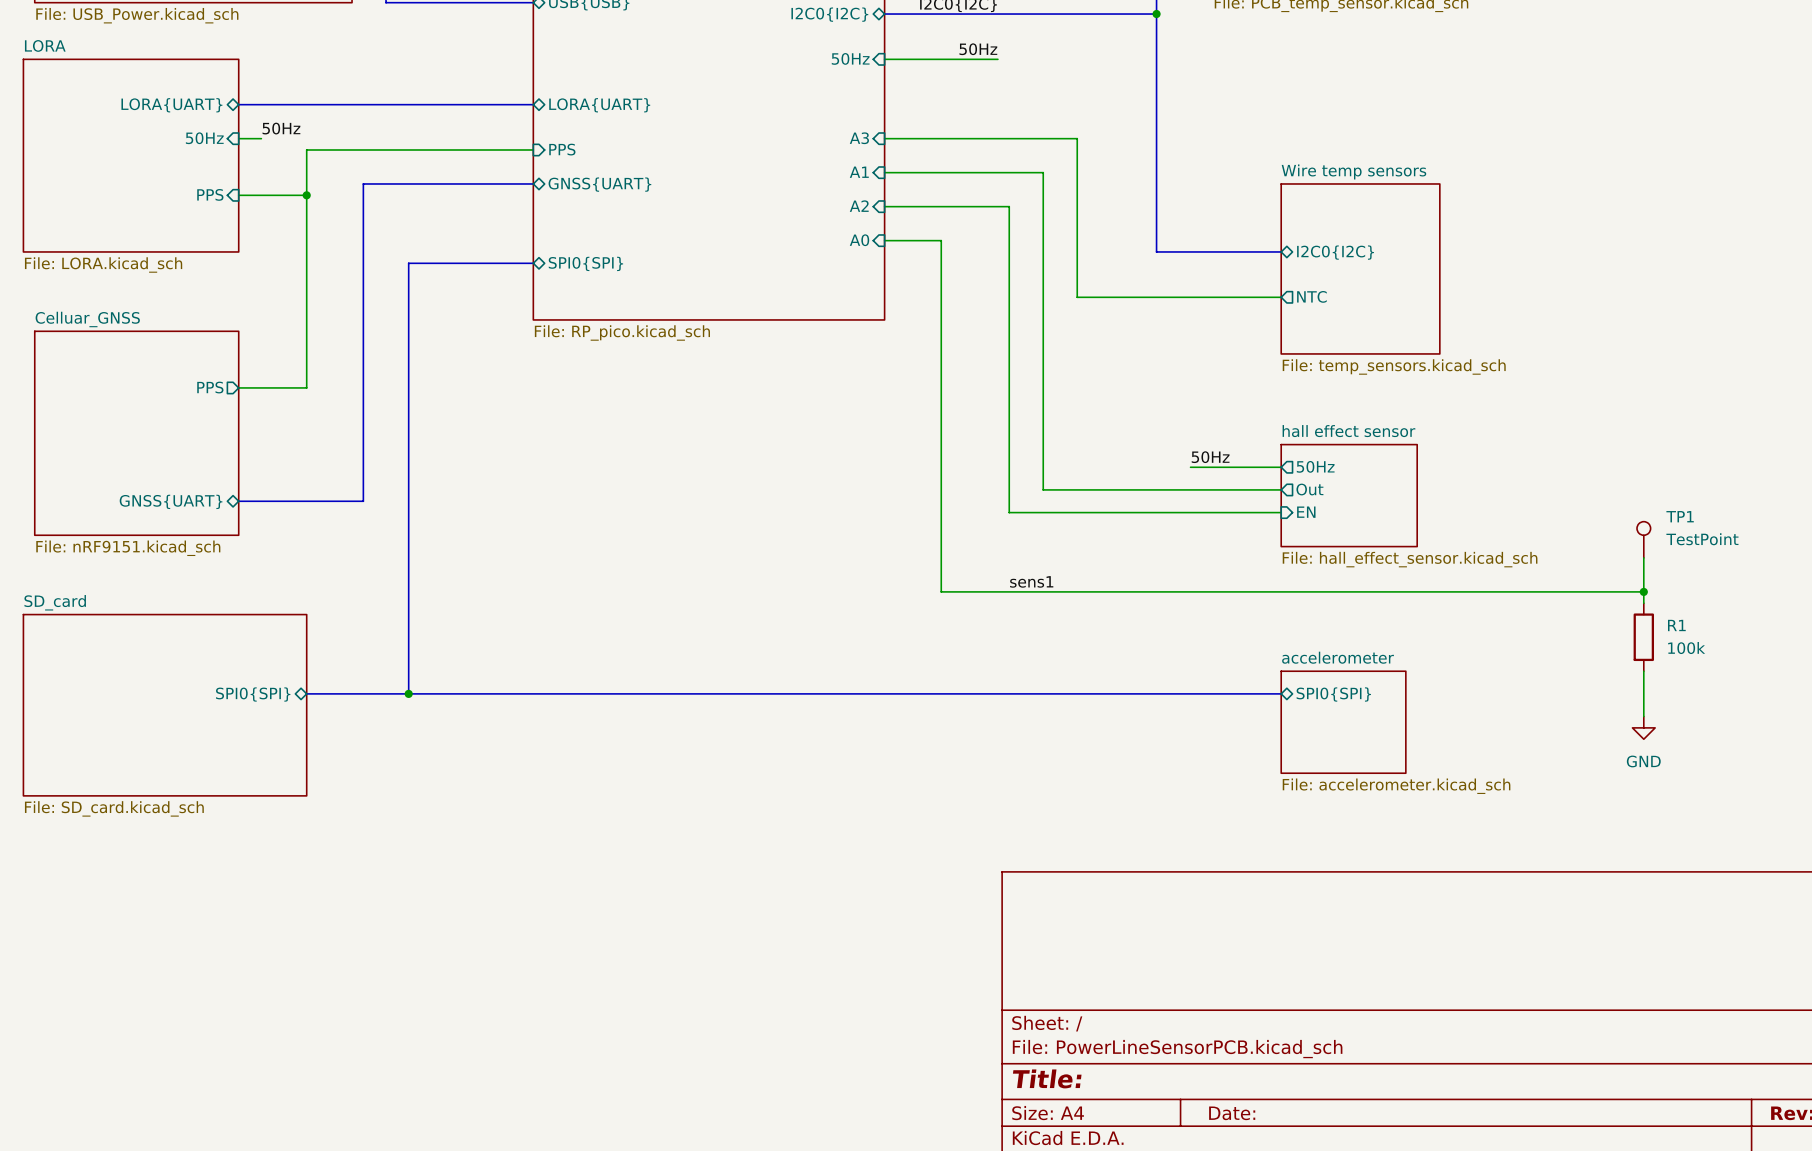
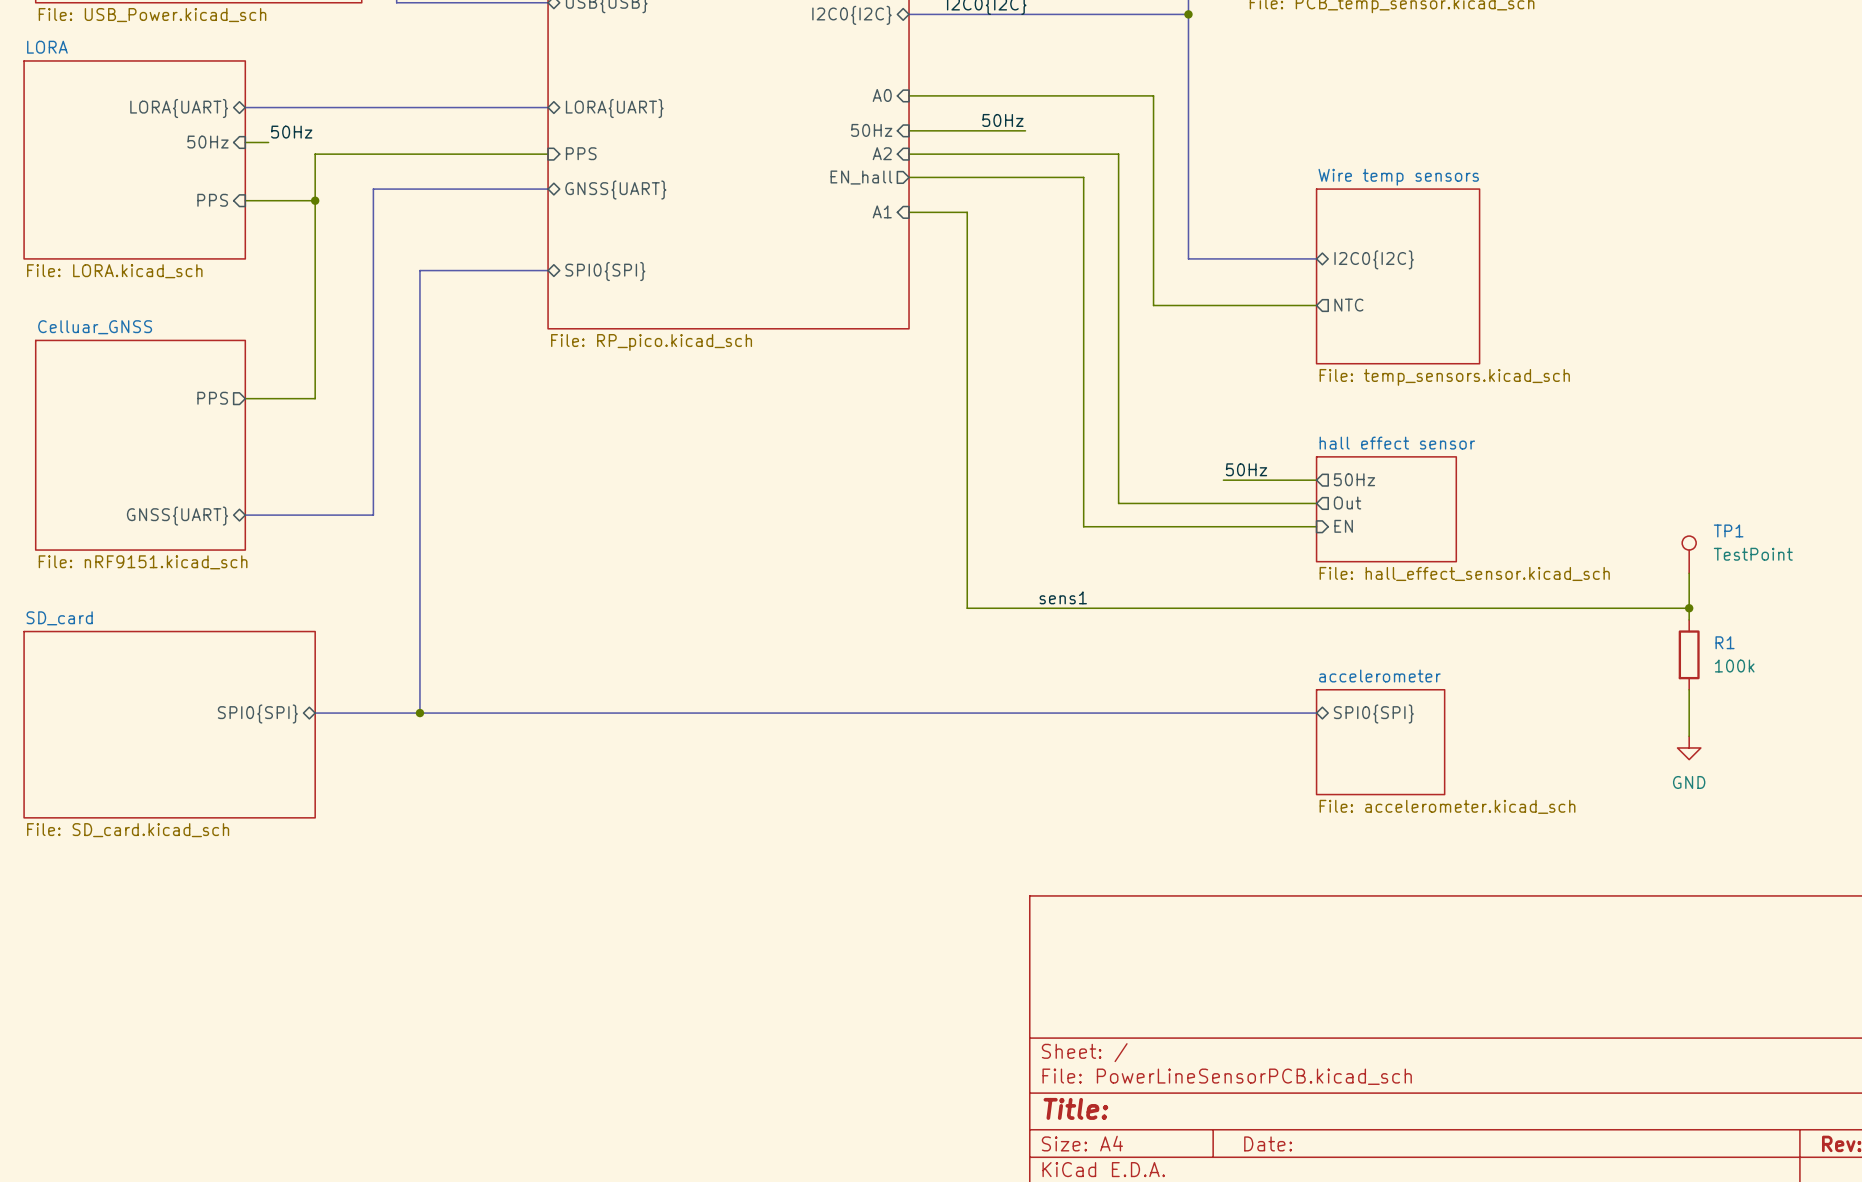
label position: 50Hz (978, 49) -> 50Hz (1002, 120)
sheet pin position: 50Hz (850, 58) -> 50Hz (871, 130)
wire: (884, 59) (997, 59) -> (909, 130) (1025, 130)
sheet pin: A3 (859, 138) -> none
wire: (884, 138) (1077, 138) (1077, 297) (1122, 297) -> (909, 95) (1153, 95) (1153, 305)
sheet pin: none -> A2 (882, 153)
wire: none -> (909, 154) (1118, 154) (1118, 503)
sheet pin shape: input (859, 172) -> output (861, 177)
sheet pin: A1 (859, 172) -> EN_hall (861, 177)
wire: (1043, 172) (1043, 489) (1088, 489) -> (1072, 177) (1083, 177) (1083, 526)
sheet pin: A2 (859, 206) -> A1 (882, 211)
wire: (941, 206) (1009, 206) (1009, 512) (1054, 512) -> none
sheet pin position: A0 (859, 240) -> A0 (882, 95)
wire: (884, 240) (941, 240) -> (967, 212) (967, 247)

